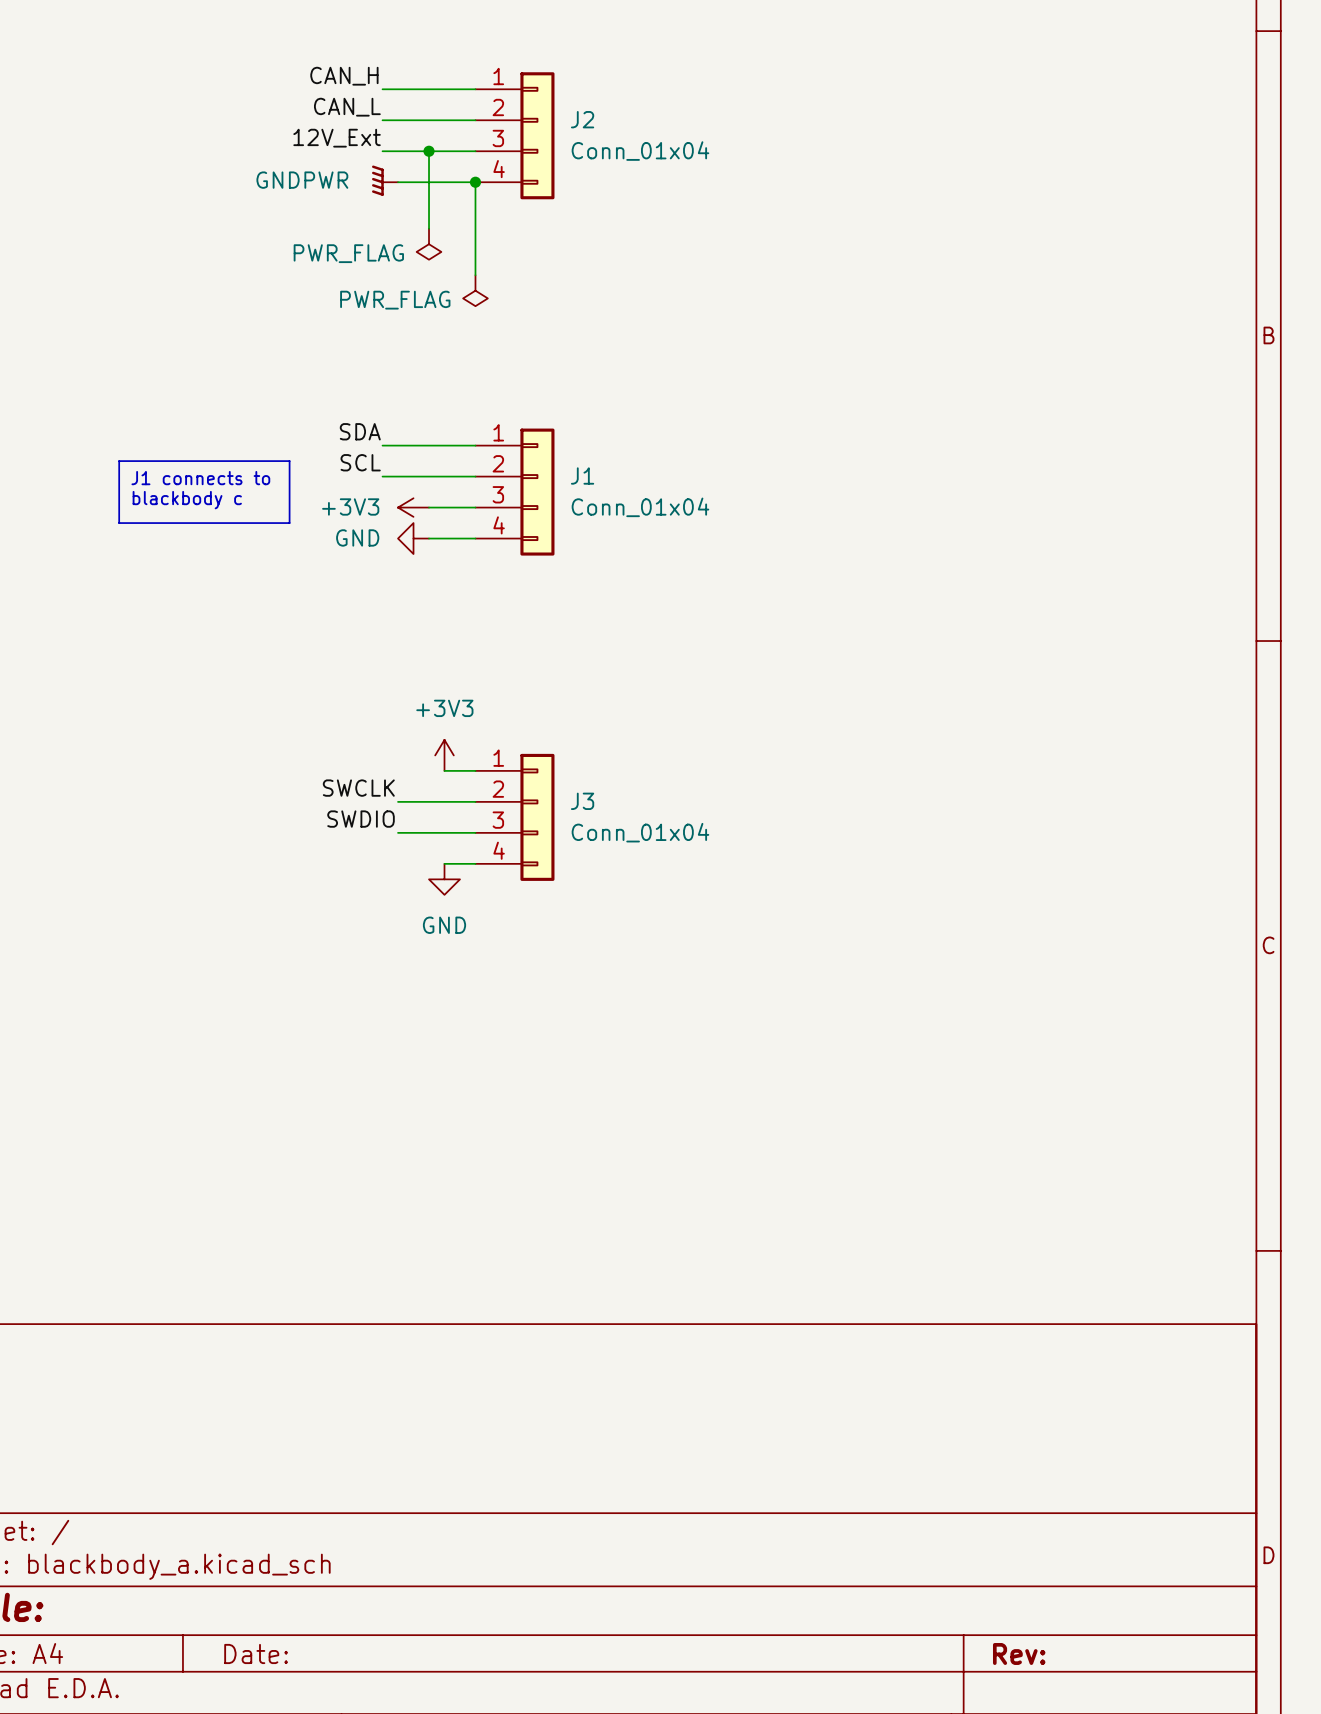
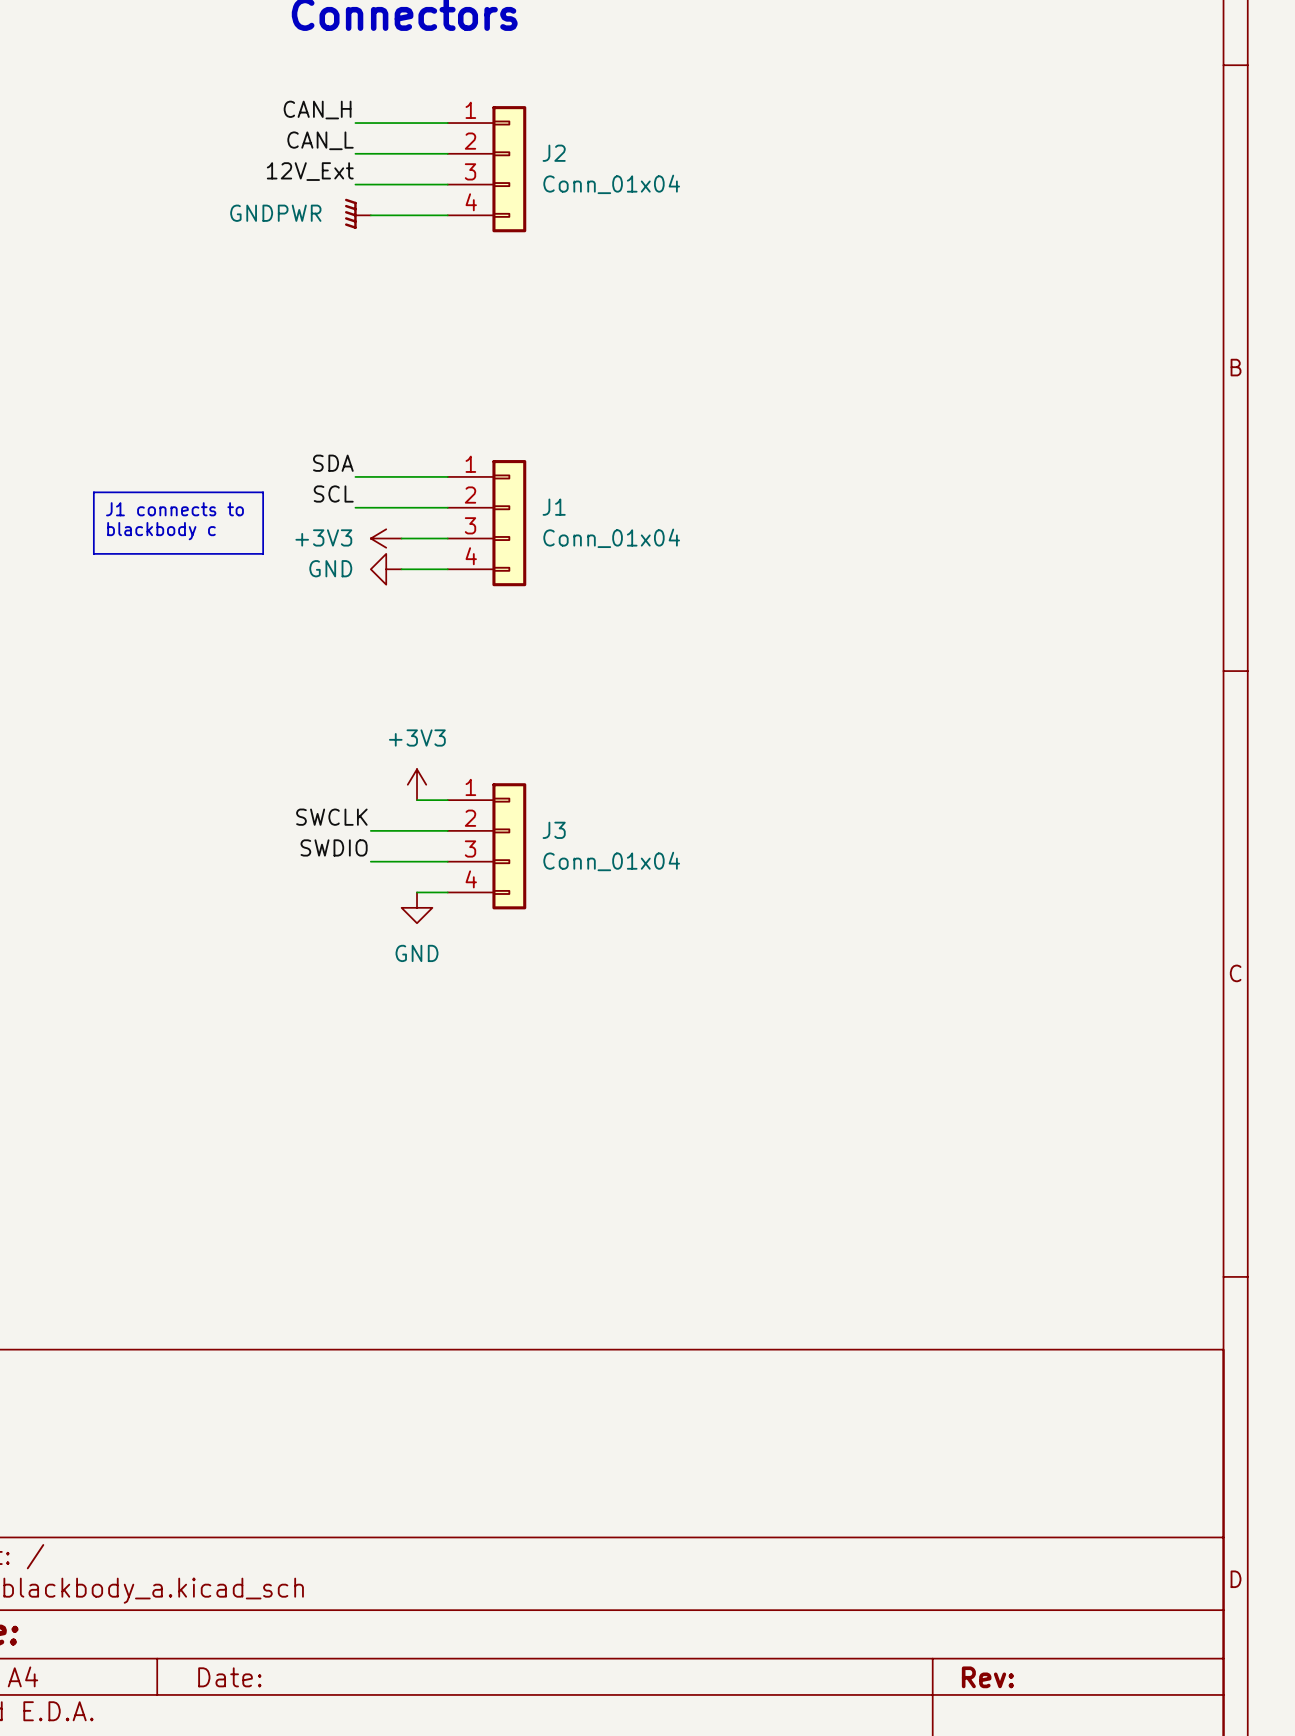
wire: (429, 151) (429, 228) -> none
junction: (429, 151) -> none
wire: (475, 182) (475, 275) -> none
junction: (475, 182) -> none
power symbol: PWR_FLAG (429, 244) -> none
power symbol: PWR_FLAG (475, 290) -> none

